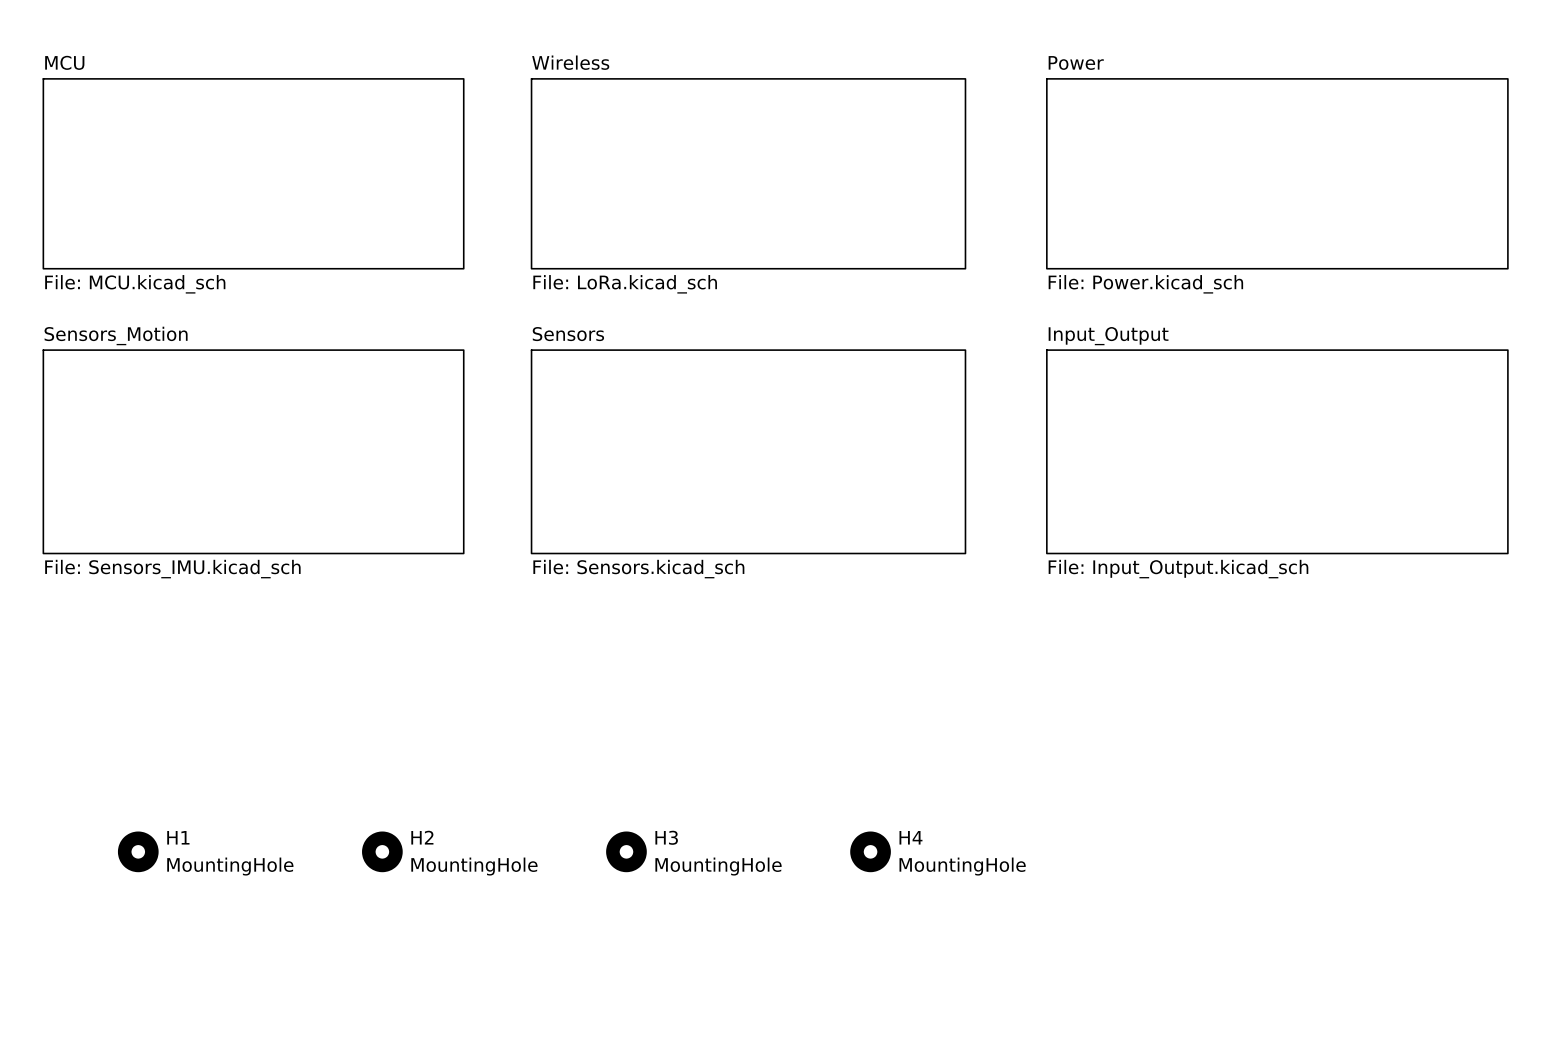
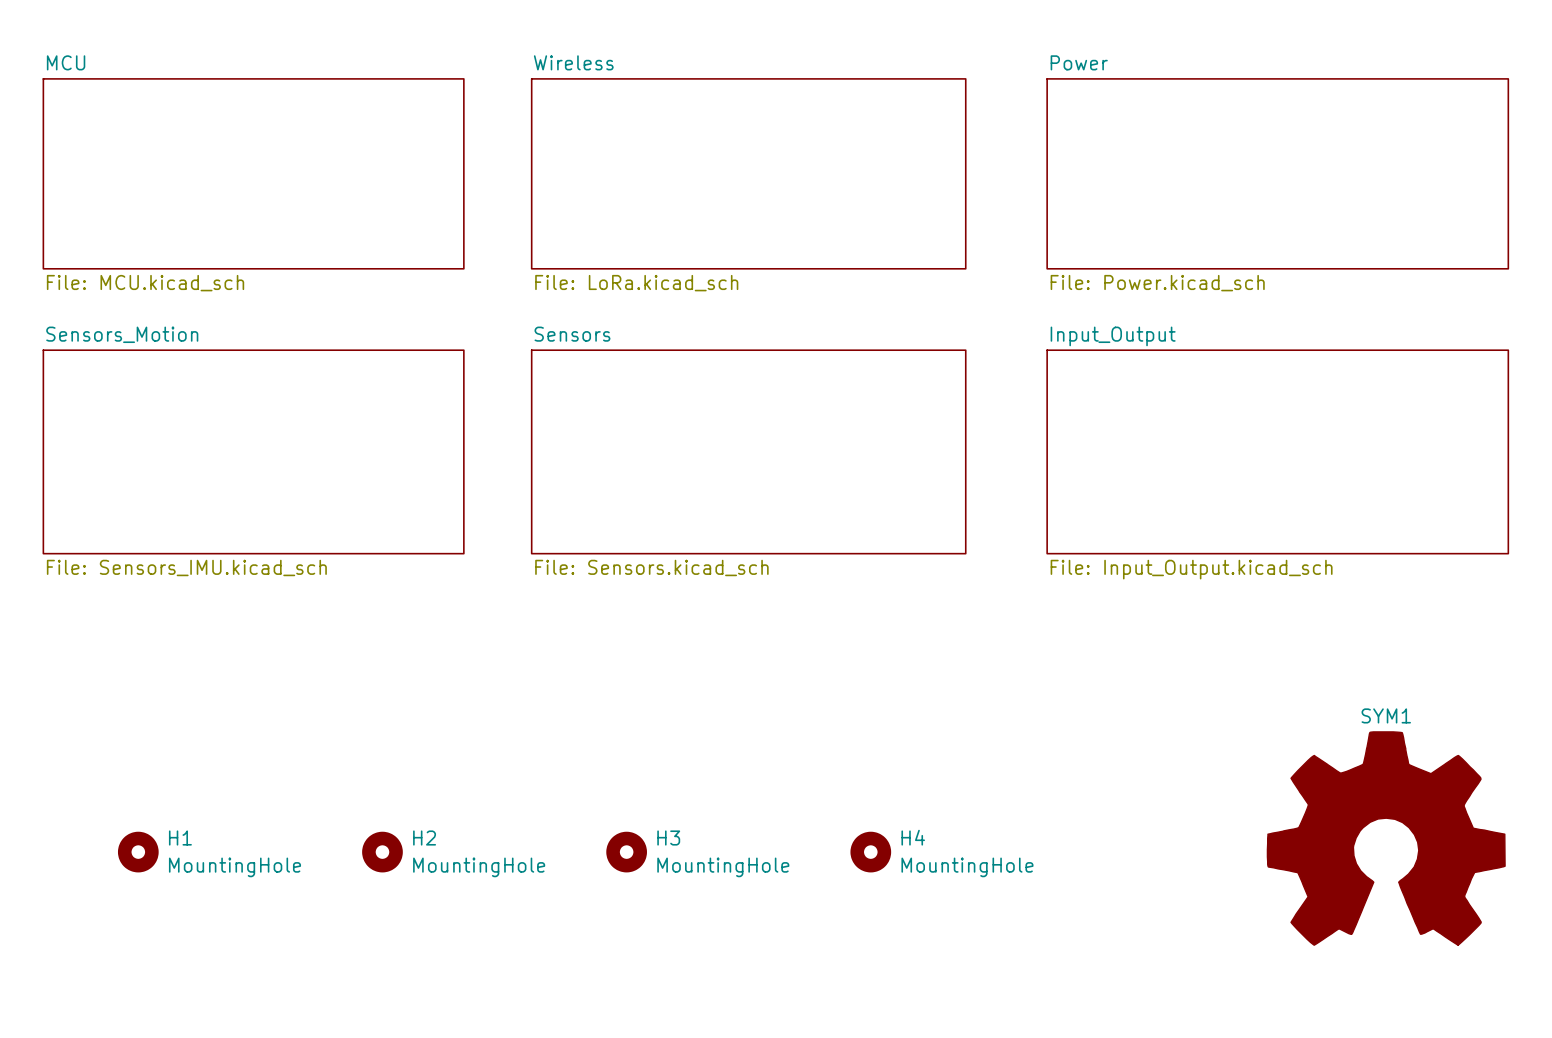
SYM1: none -> (1386, 838)

